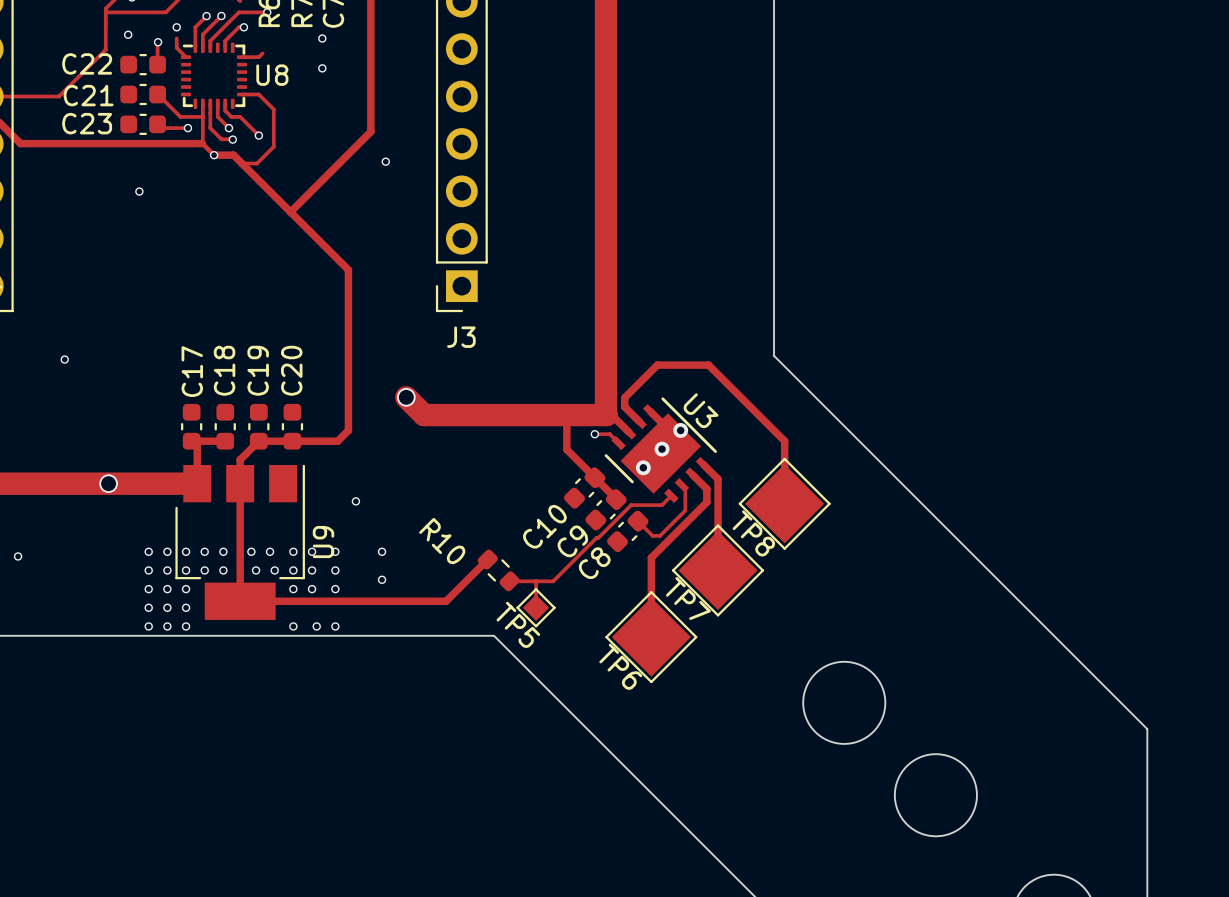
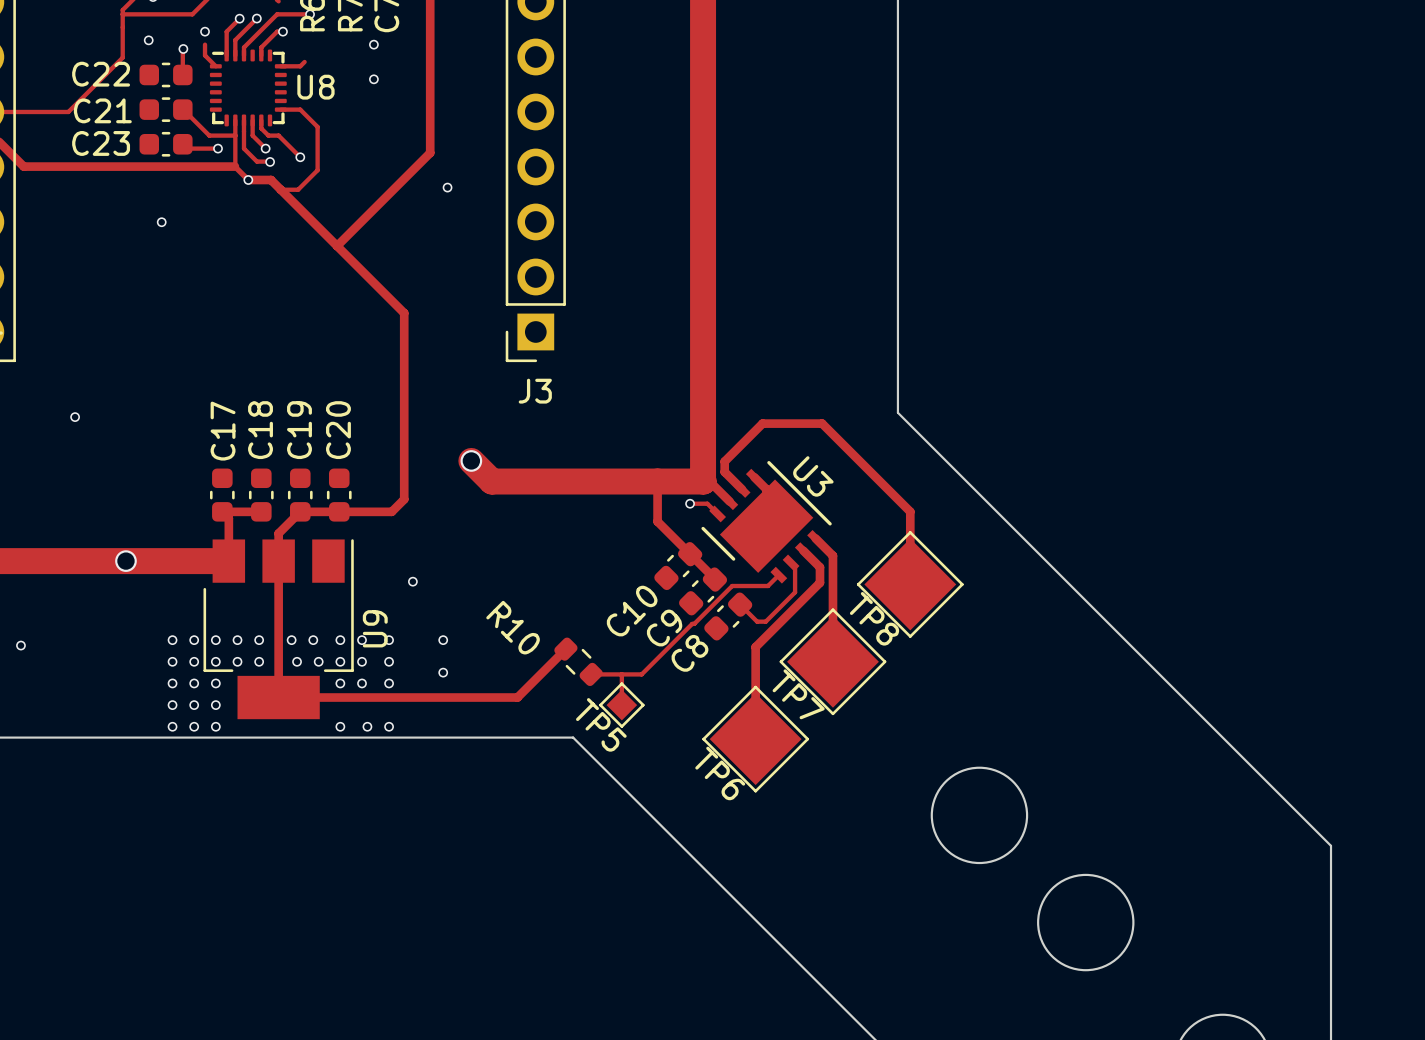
via: (680, 430) -> none
via: (662, 449) -> none
via: (643, 467) -> none

